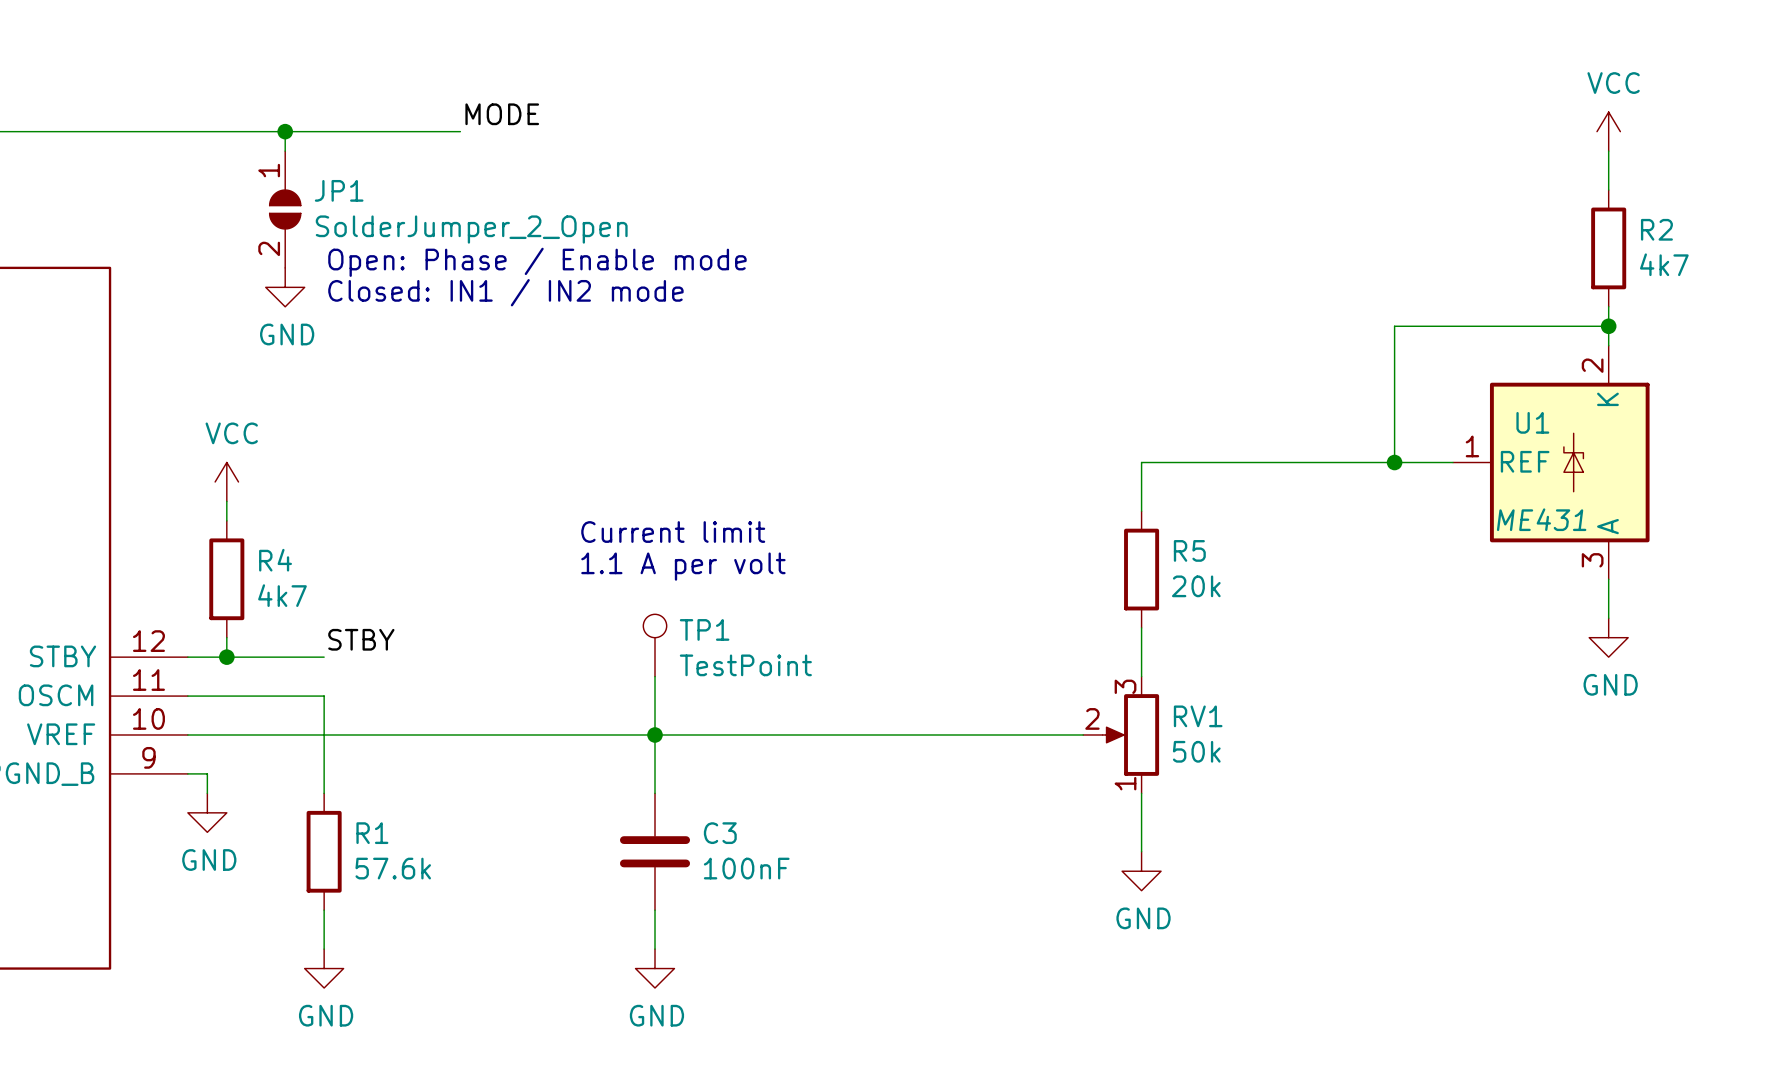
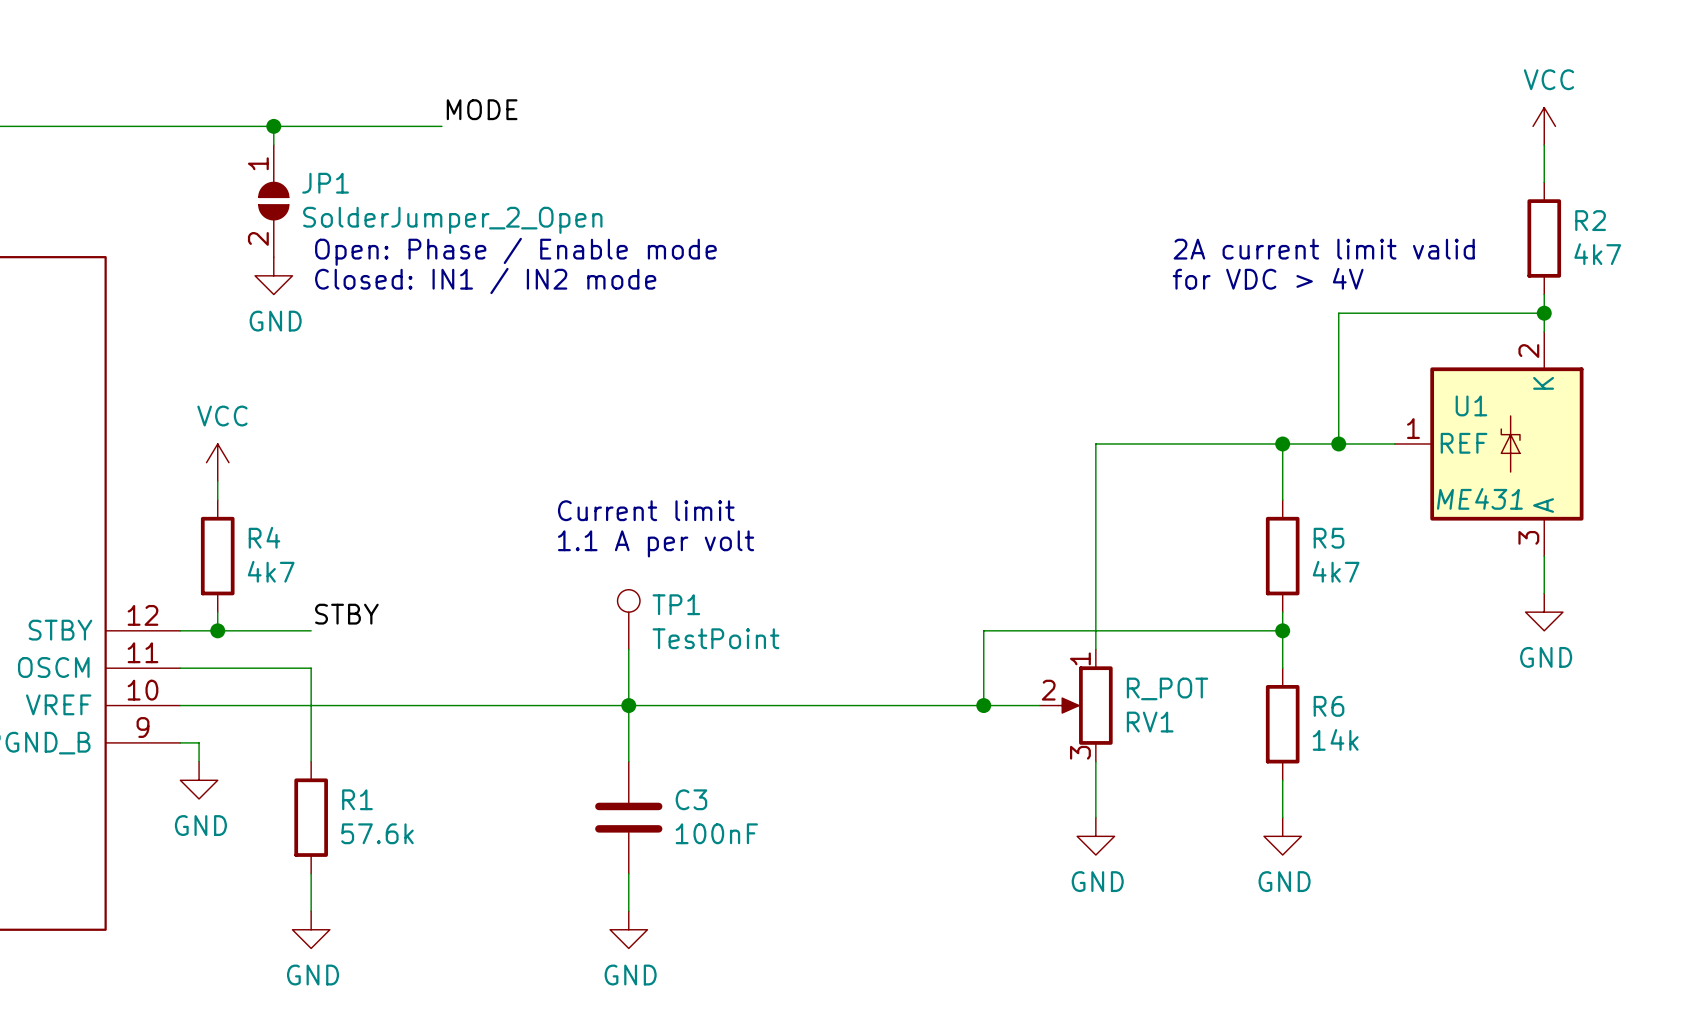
text: none -> 2A current limit valid (1324, 249)
text: none -> for VDC > 4V (1268, 278)
wire: none -> (1282, 443) (1282, 500)
junction: none -> (1282, 443)
wire: none -> (1095, 490) (1095, 602)
R5 position: (1141, 569) -> (1282, 556)
R5 value: 20k (1196, 586) -> 4k7 (1336, 571)
wire: none -> (1282, 612) (1282, 668)
wire: none -> (1282, 630) (983, 630) (983, 705)
junction: none -> (1282, 630)
junction: none -> (983, 705)
RV1 flip: as is (1130, 734) -> up-down (1085, 705)
RV1 value: 50k (1196, 751) -> R_POT (1167, 688)
R6: none -> 14k (1282, 724)
wire: none -> (1282, 780) (1282, 817)
power symbol: none -> GND (1282, 836)

